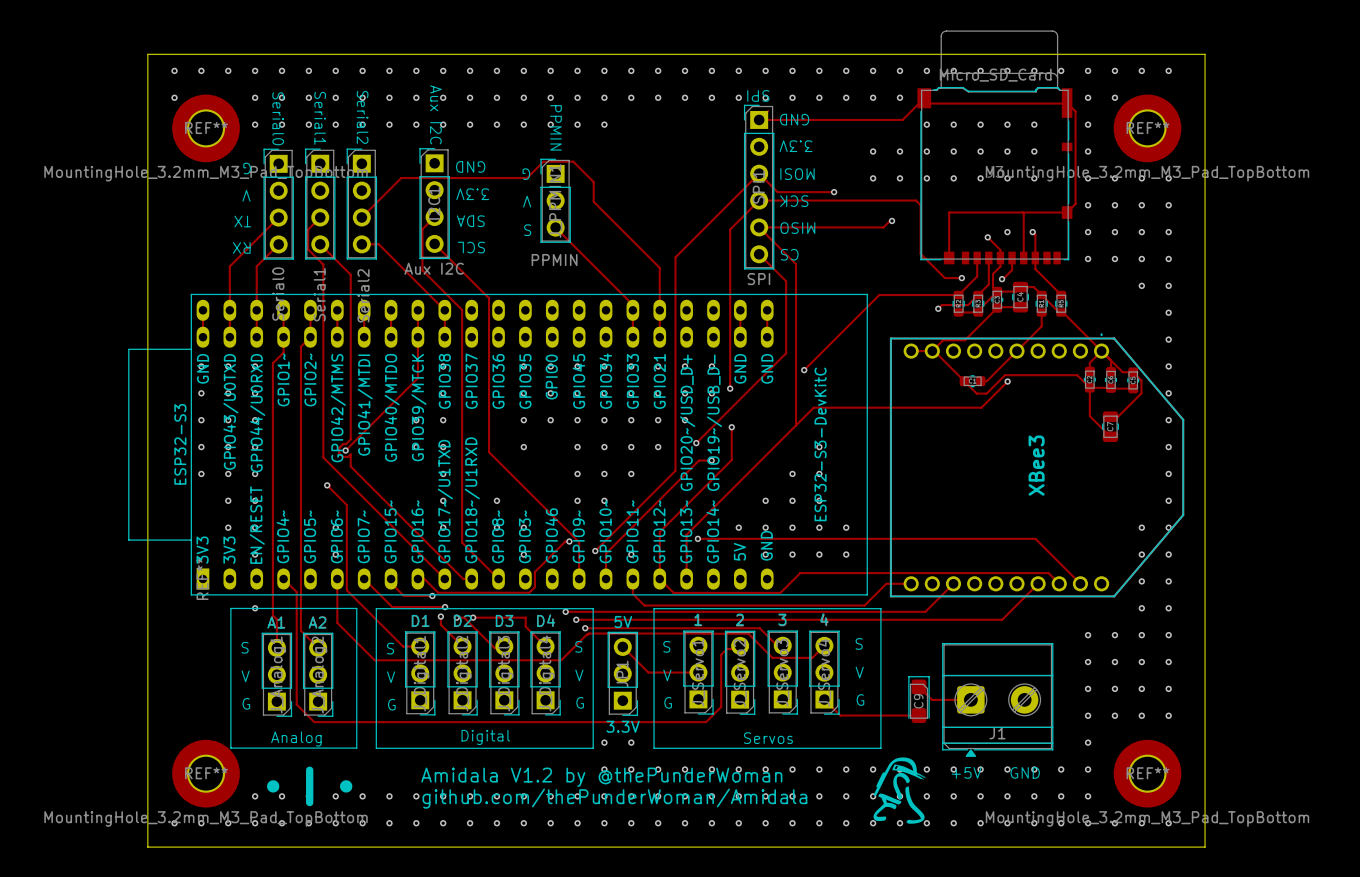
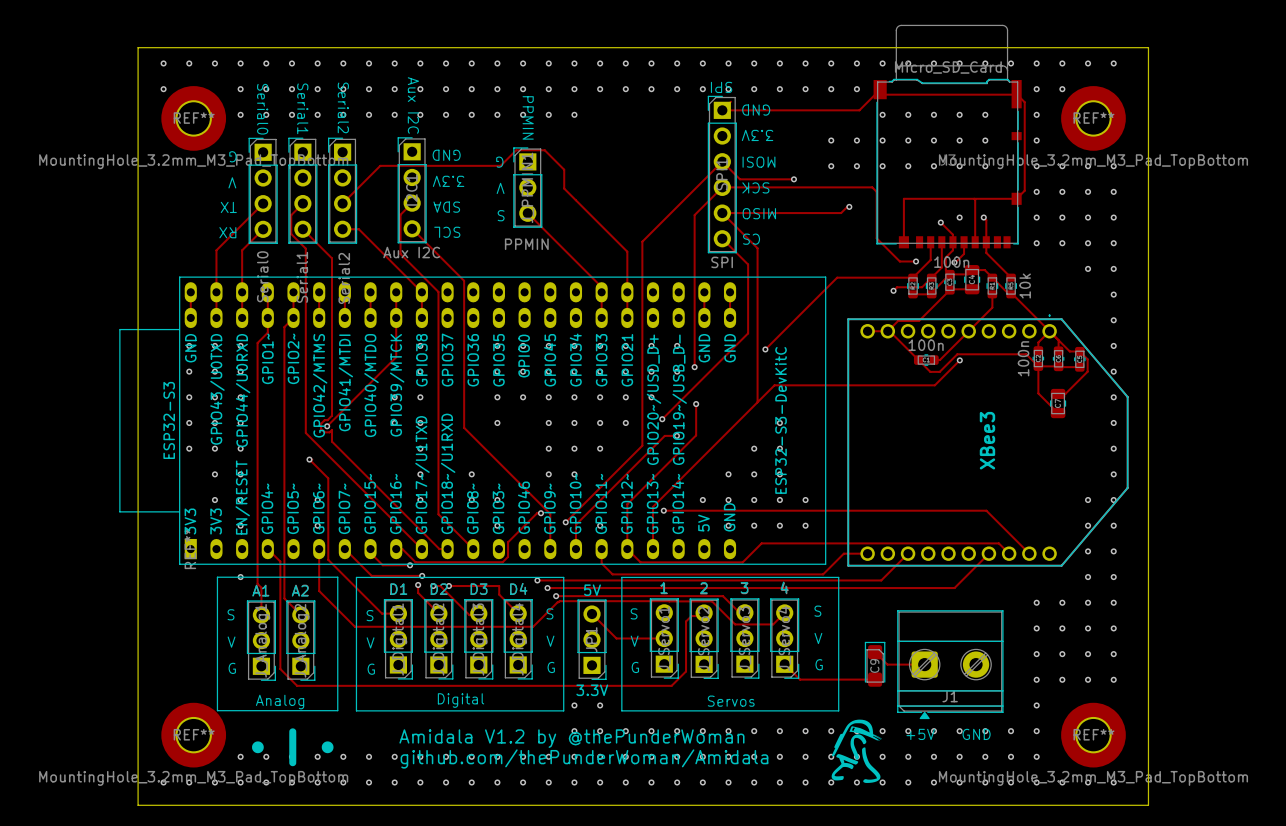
part value: none -> 100n (951, 262)
part value: none -> 10k (1025, 286)
part value: none -> 100n (926, 345)
part value: none -> 100n (1023, 358)

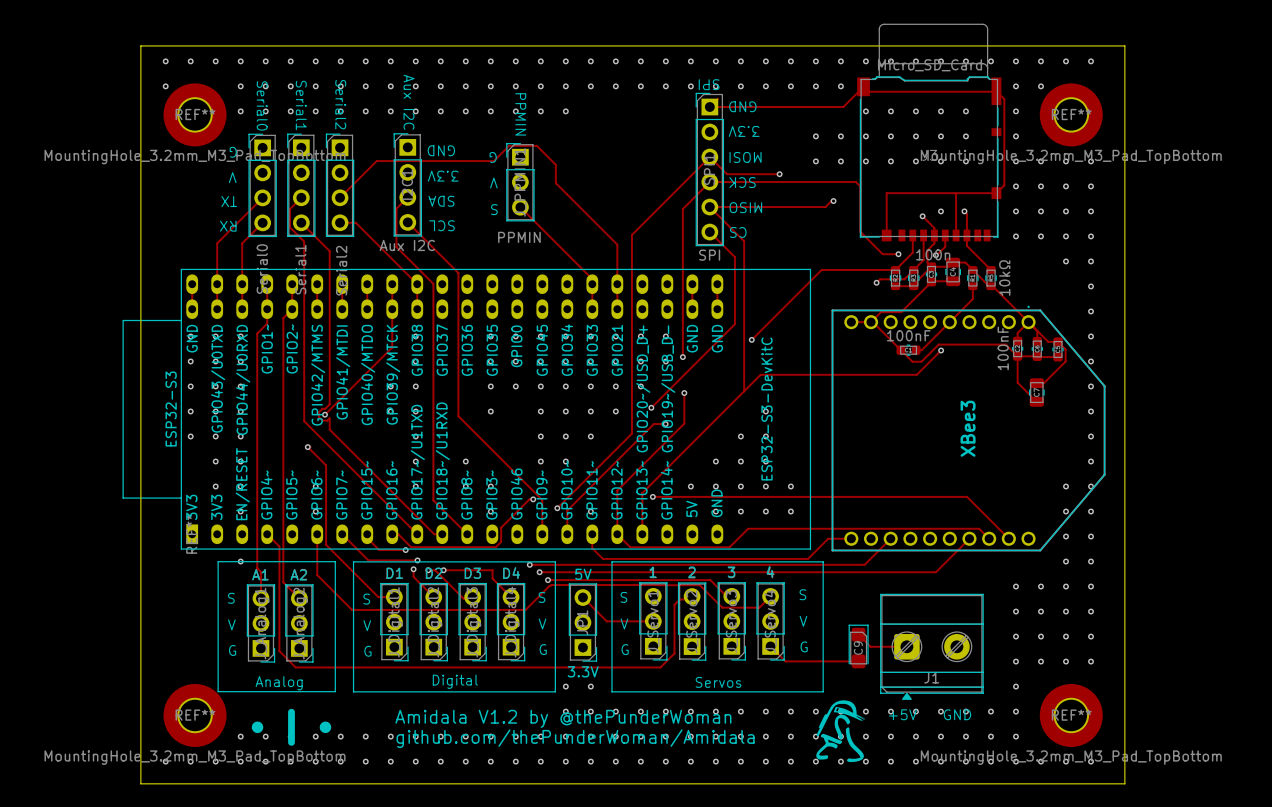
part value: 10k (1025, 286) -> 10kΩ (1004, 278)
part value: 100n (926, 345) -> 100nF (908, 335)
part value: 100n (1023, 358) -> 100nF (1003, 348)

